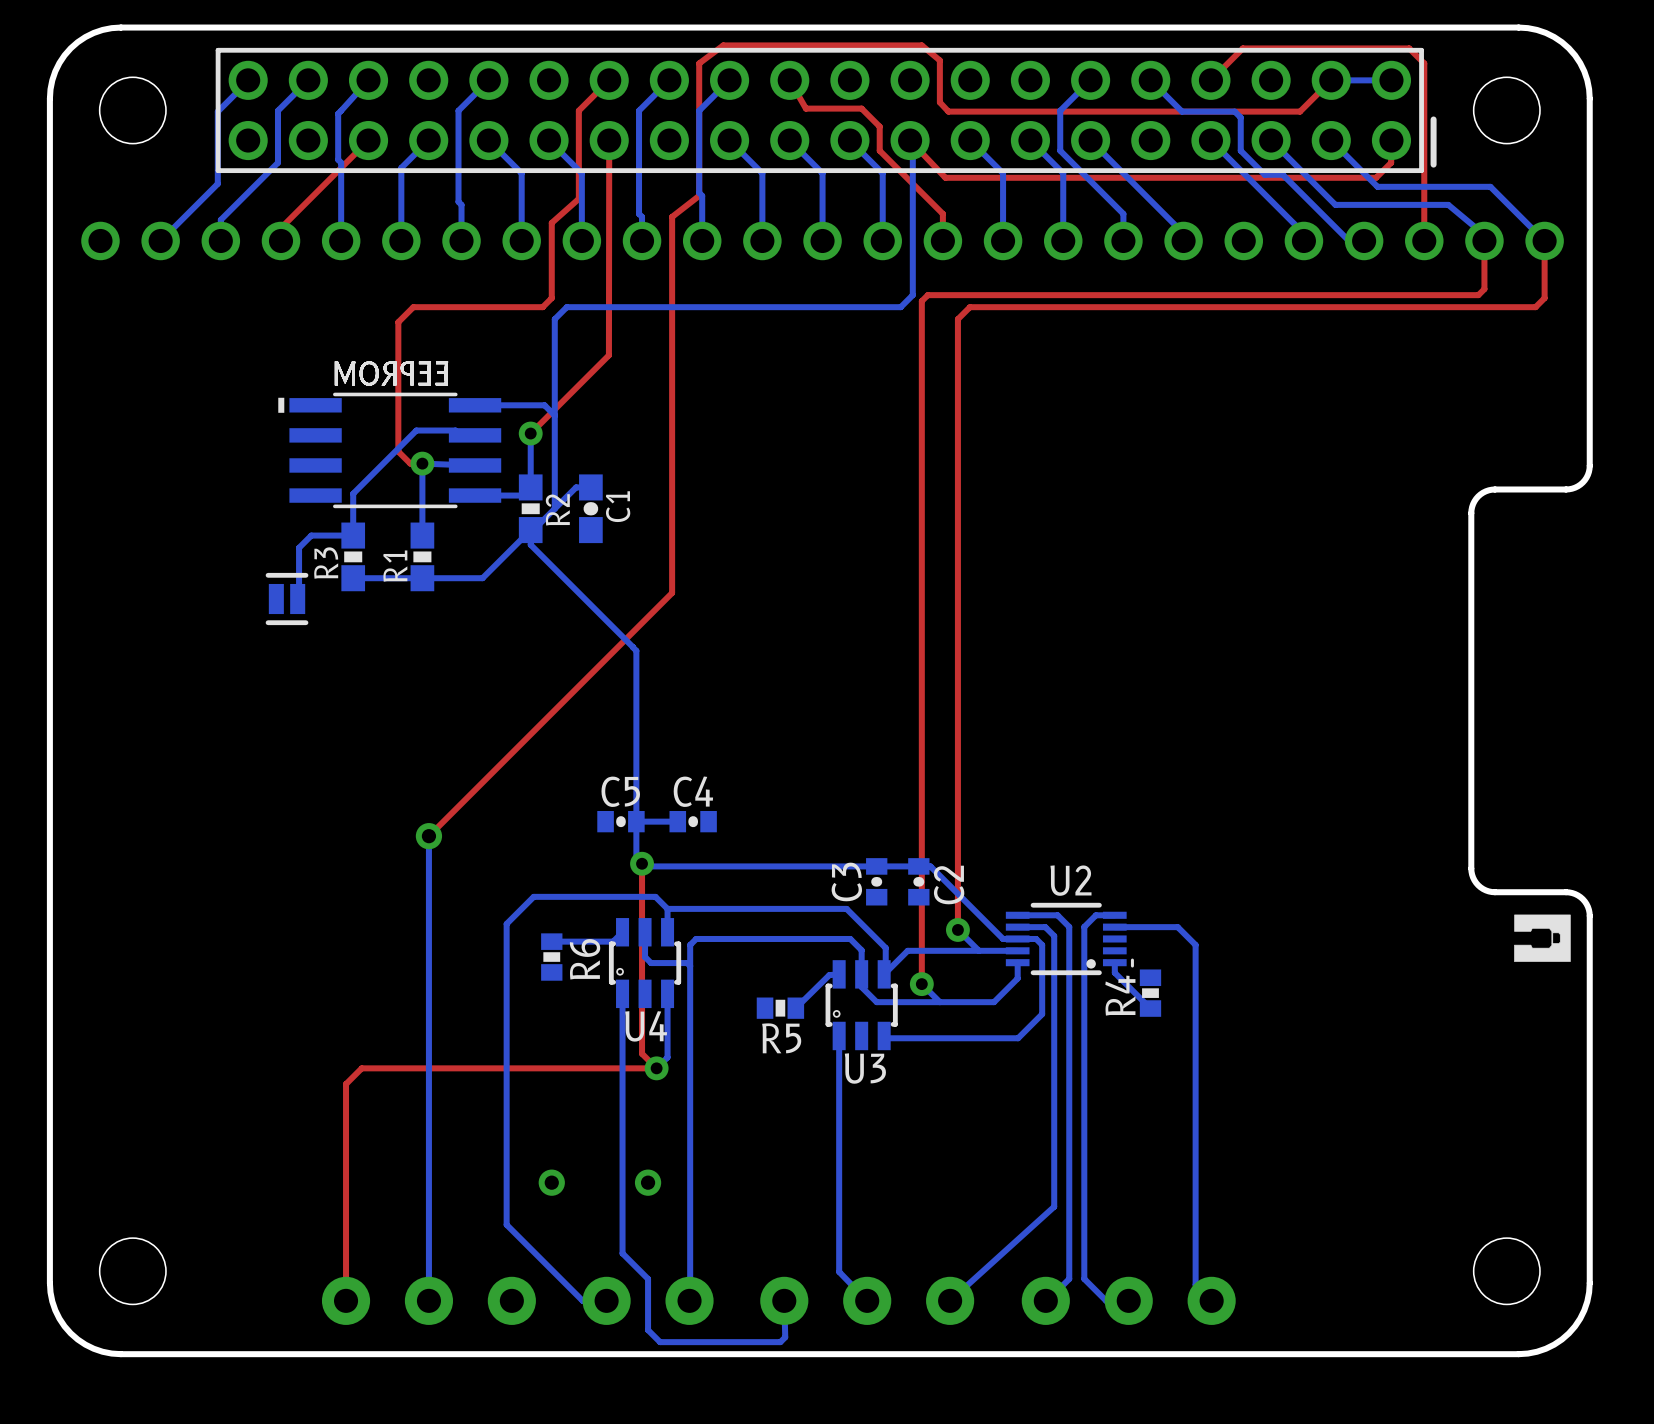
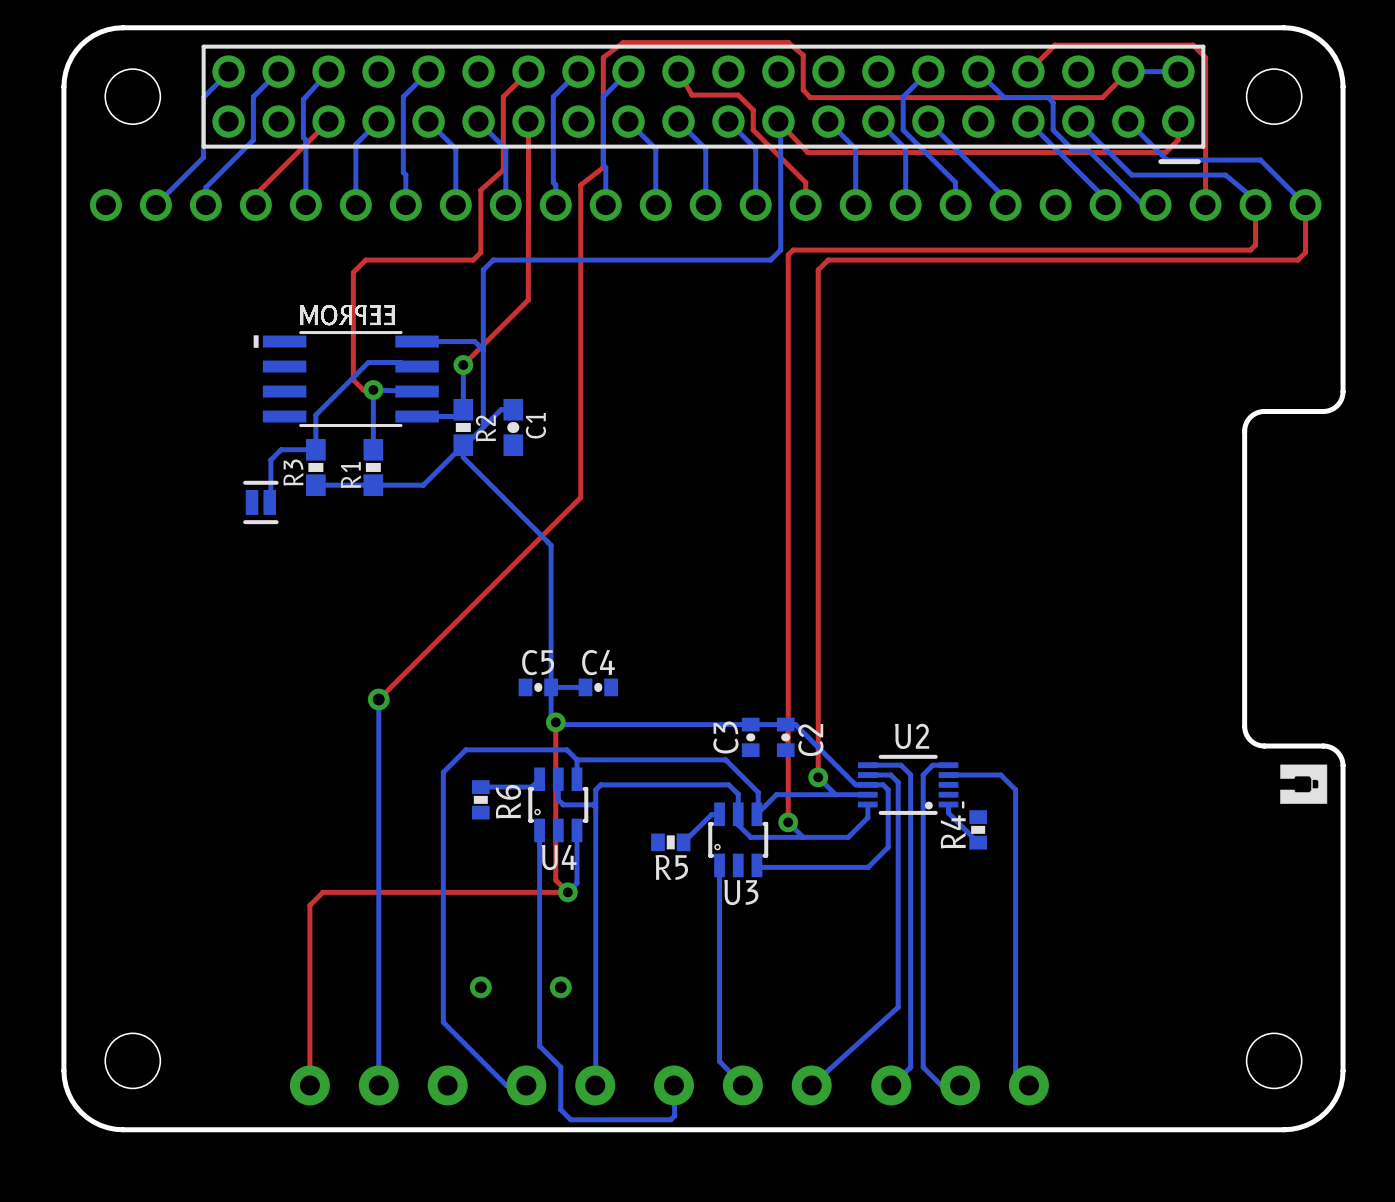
part footprint: [215, 47, 1437, 174] -> [201, 44, 1206, 165]

